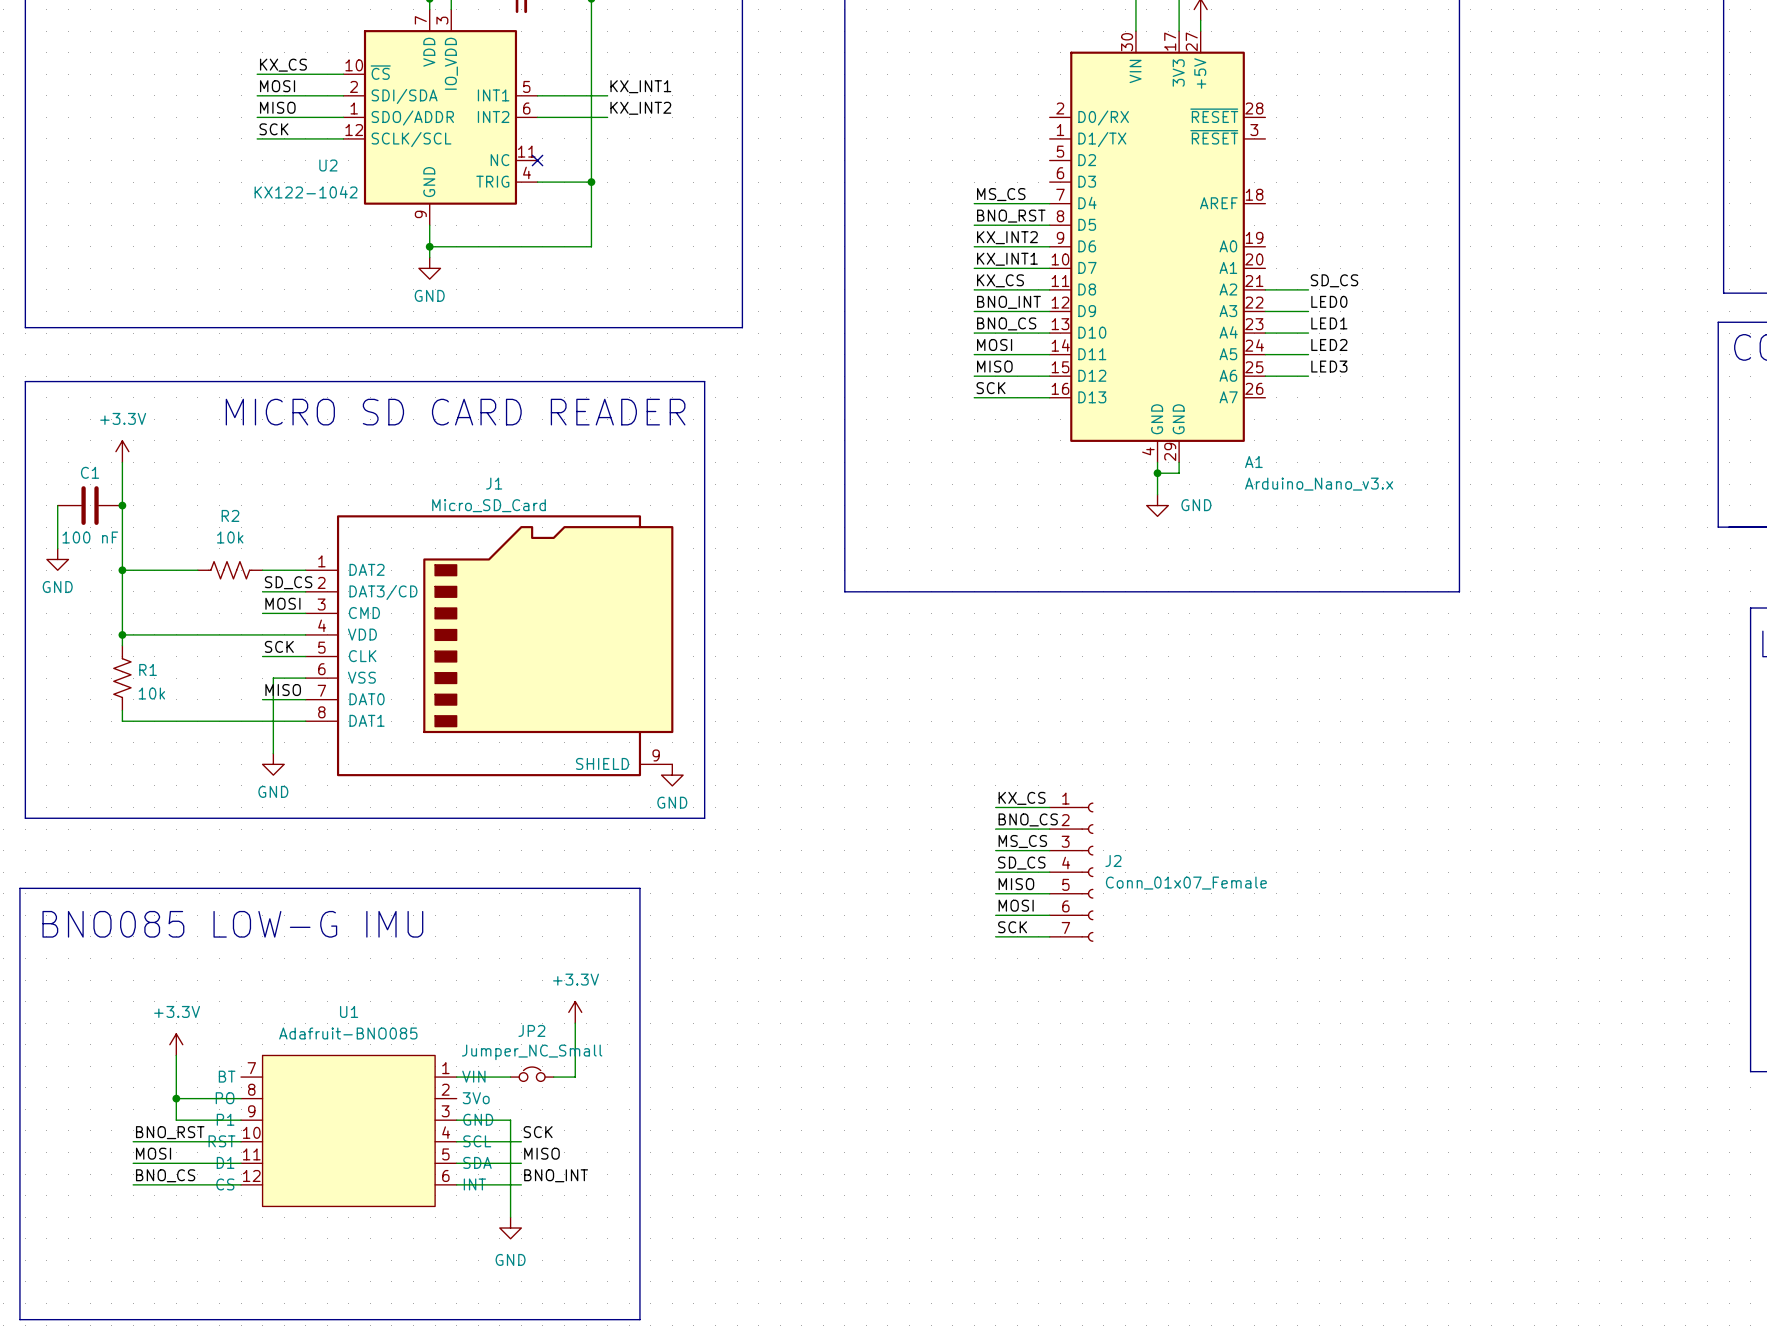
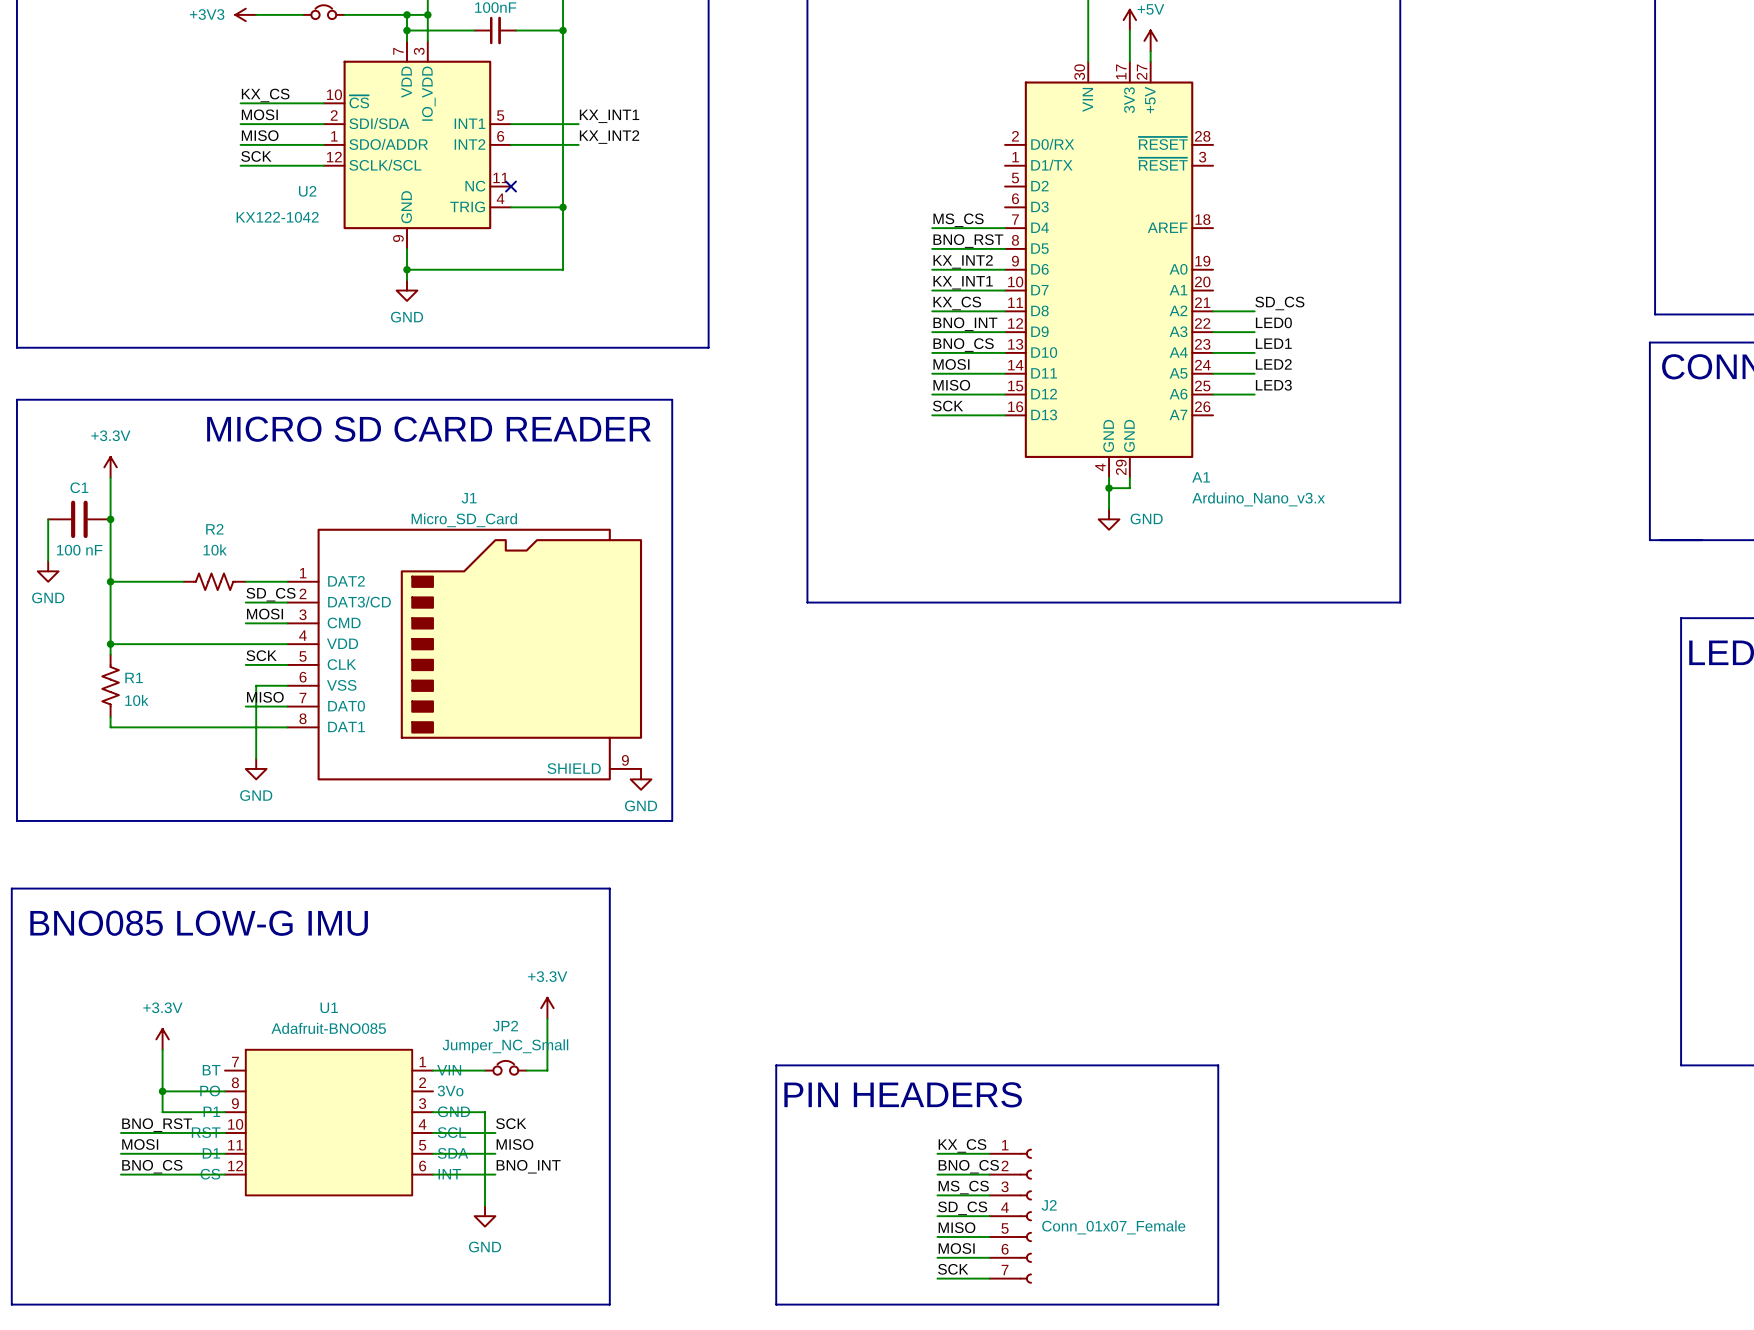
label: KX_CS (1022, 798) -> none
wire: (995, 807) (1049, 807) -> none
label: BNO_CS (1028, 819) -> none
wire: (995, 829) (1049, 829) -> none
label: MS_CS (1022, 841) -> none
wire: (995, 850) (1049, 850) -> none
label: SD_CS (1021, 863) -> none
wire: (995, 872) (1049, 872) -> none
J2 position: (1071, 872) -> (1010, 1216)
label: MISO (1016, 884) -> none
wire: (995, 893) (1049, 893) -> none
label: MOSI (1016, 905) -> none
wire: (995, 915) (1049, 915) -> none
label: SCK (1012, 927) -> none
wire: (995, 936) (1049, 936) -> none
line: none -> (776, 1065) (1218, 1065) (1218, 1304) (776, 1304) (776, 1065)
text: none -> PIN HEADERS (903, 1094)
label: none -> KX_CS (962, 1145)
wire: none -> (937, 1153) (989, 1153)
label: none -> BNO_CS (968, 1166)
wire: none -> (937, 1174) (989, 1174)
label: none -> MS_CS (963, 1187)
wire: none -> (937, 1195) (989, 1195)
label: none -> SD_CS (962, 1208)
wire: none -> (937, 1216) (989, 1216)
label: none -> MISO (957, 1227)
wire: none -> (937, 1236) (989, 1236)
label: none -> MOSI (956, 1248)
wire: none -> (937, 1257) (989, 1257)
label: none -> SCK (953, 1269)
wire: none -> (937, 1278) (989, 1278)

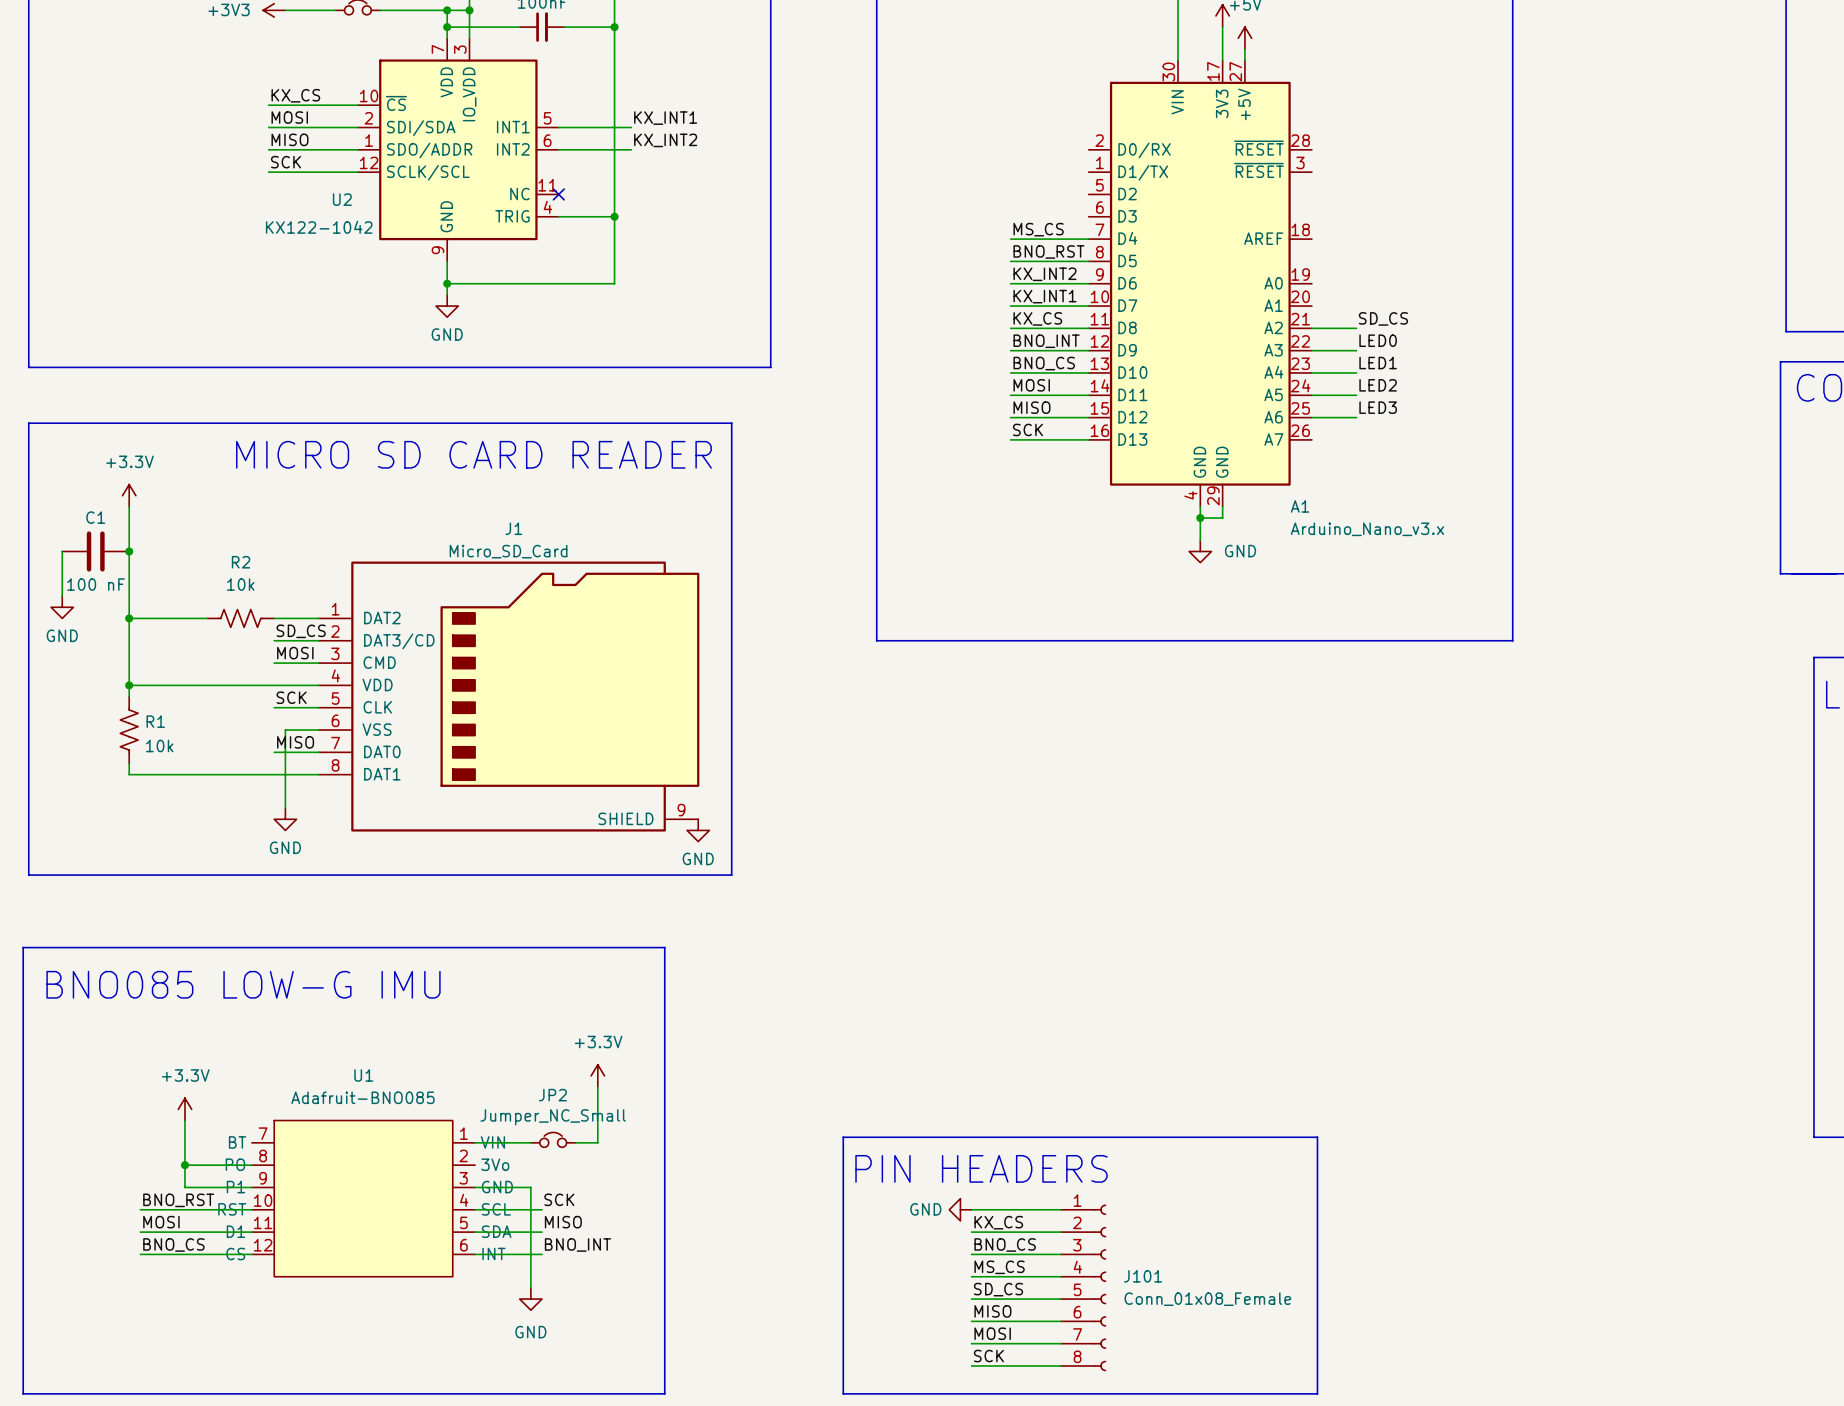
power symbol: none -> GND (960, 1209)
wire: none -> (971, 1209) (1060, 1209)
label position: KX_CS (962, 1145) -> KX_CS (998, 1222)
wire: none -> (971, 1232) (1016, 1232)
label position: BNO_CS (968, 1166) -> BNO_CS (1005, 1244)
wire: none -> (971, 1254) (1016, 1254)
label position: MS_CS (963, 1187) -> MS_CS (999, 1267)
wire: none -> (971, 1276) (1016, 1276)
J101: none -> Conn_01x08_Female (1083, 1287)
label position: SD_CS (962, 1208) -> SD_CS (998, 1289)
wire: none -> (971, 1299) (1016, 1299)
J2: Conn_01x07_Female (1010, 1216) -> none
label position: MISO (957, 1227) -> MISO (992, 1311)
wire: none -> (971, 1321) (1016, 1321)
label position: MOSI (956, 1248) -> MOSI (992, 1333)
wire: none -> (971, 1343) (1016, 1343)
label position: SCK (953, 1269) -> SCK (988, 1356)
wire: none -> (971, 1365) (1016, 1365)

